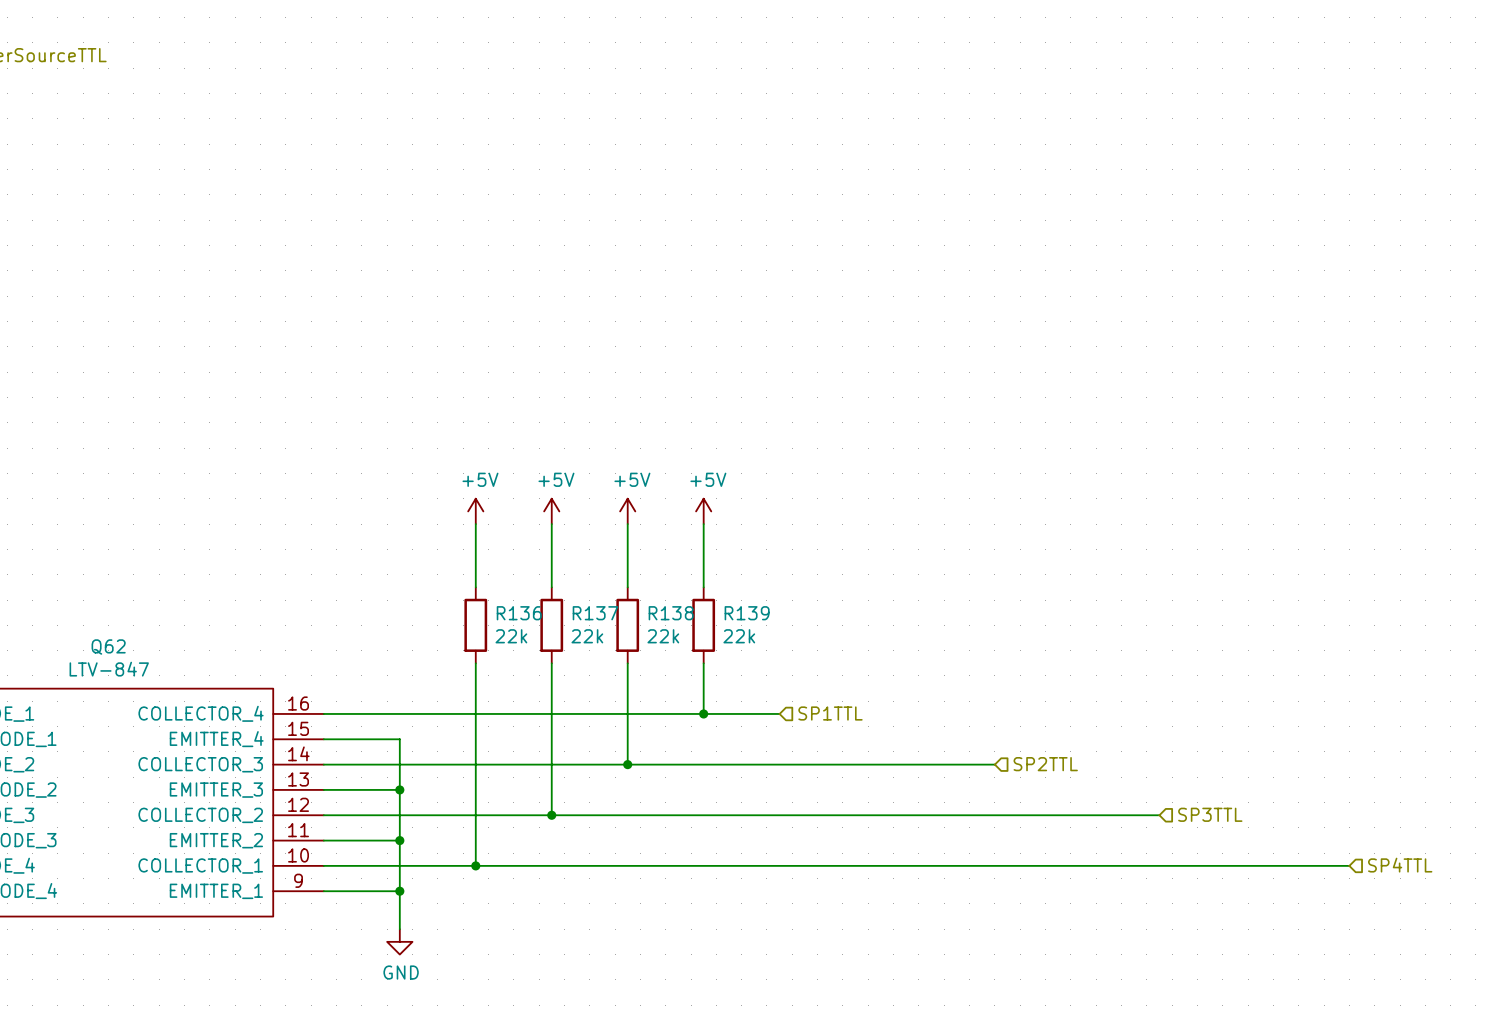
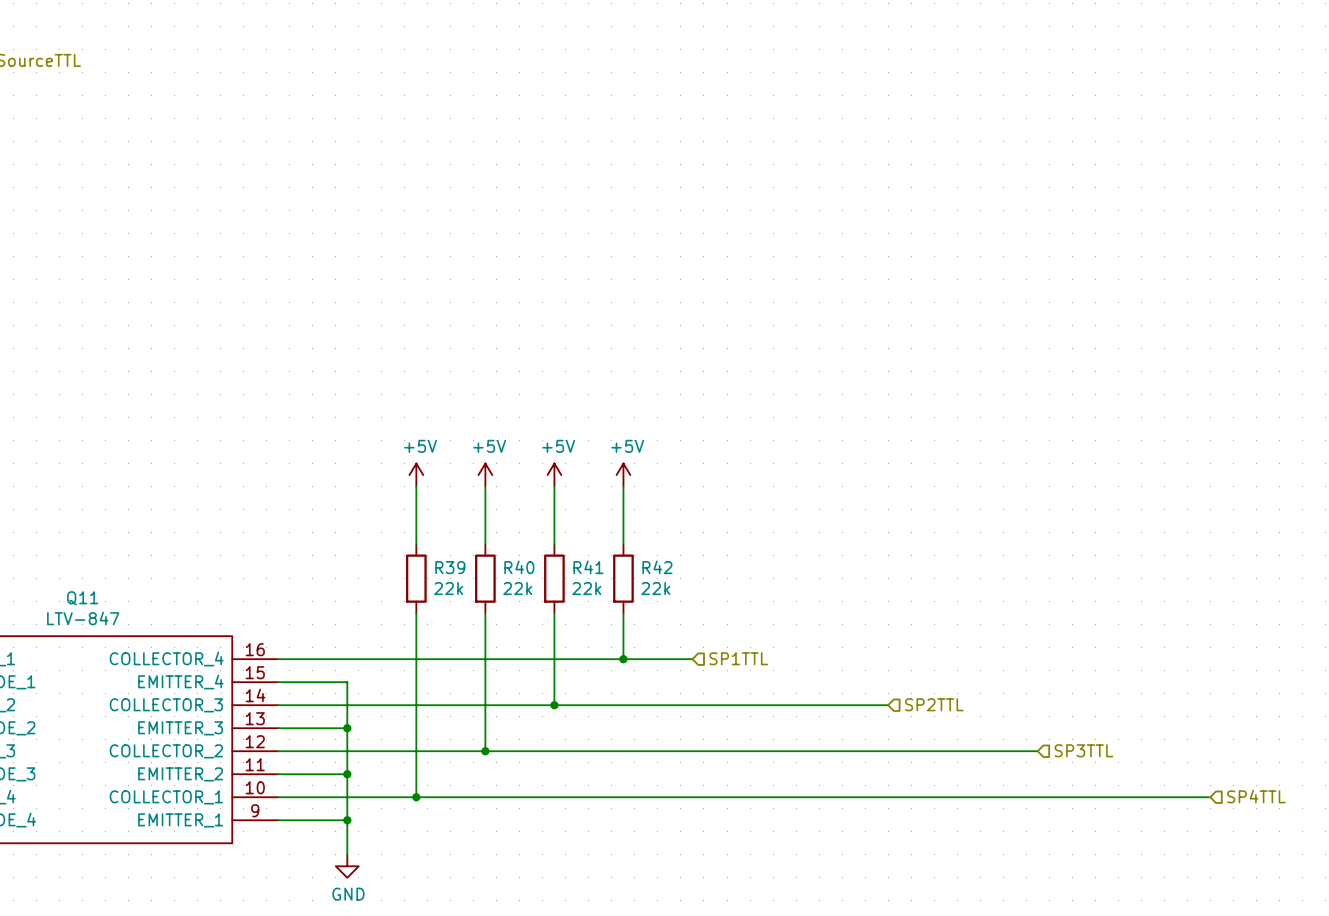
R136 name: R136 (519, 613) -> R39 (450, 567)
R137 name: R137 (595, 613) -> R40 (519, 567)
R138 name: R138 (671, 613) -> R41 (588, 567)
R139 name: R139 (747, 613) -> R42 (657, 567)
Q62 name: Q62 (108, 647) -> Q11 (82, 598)

